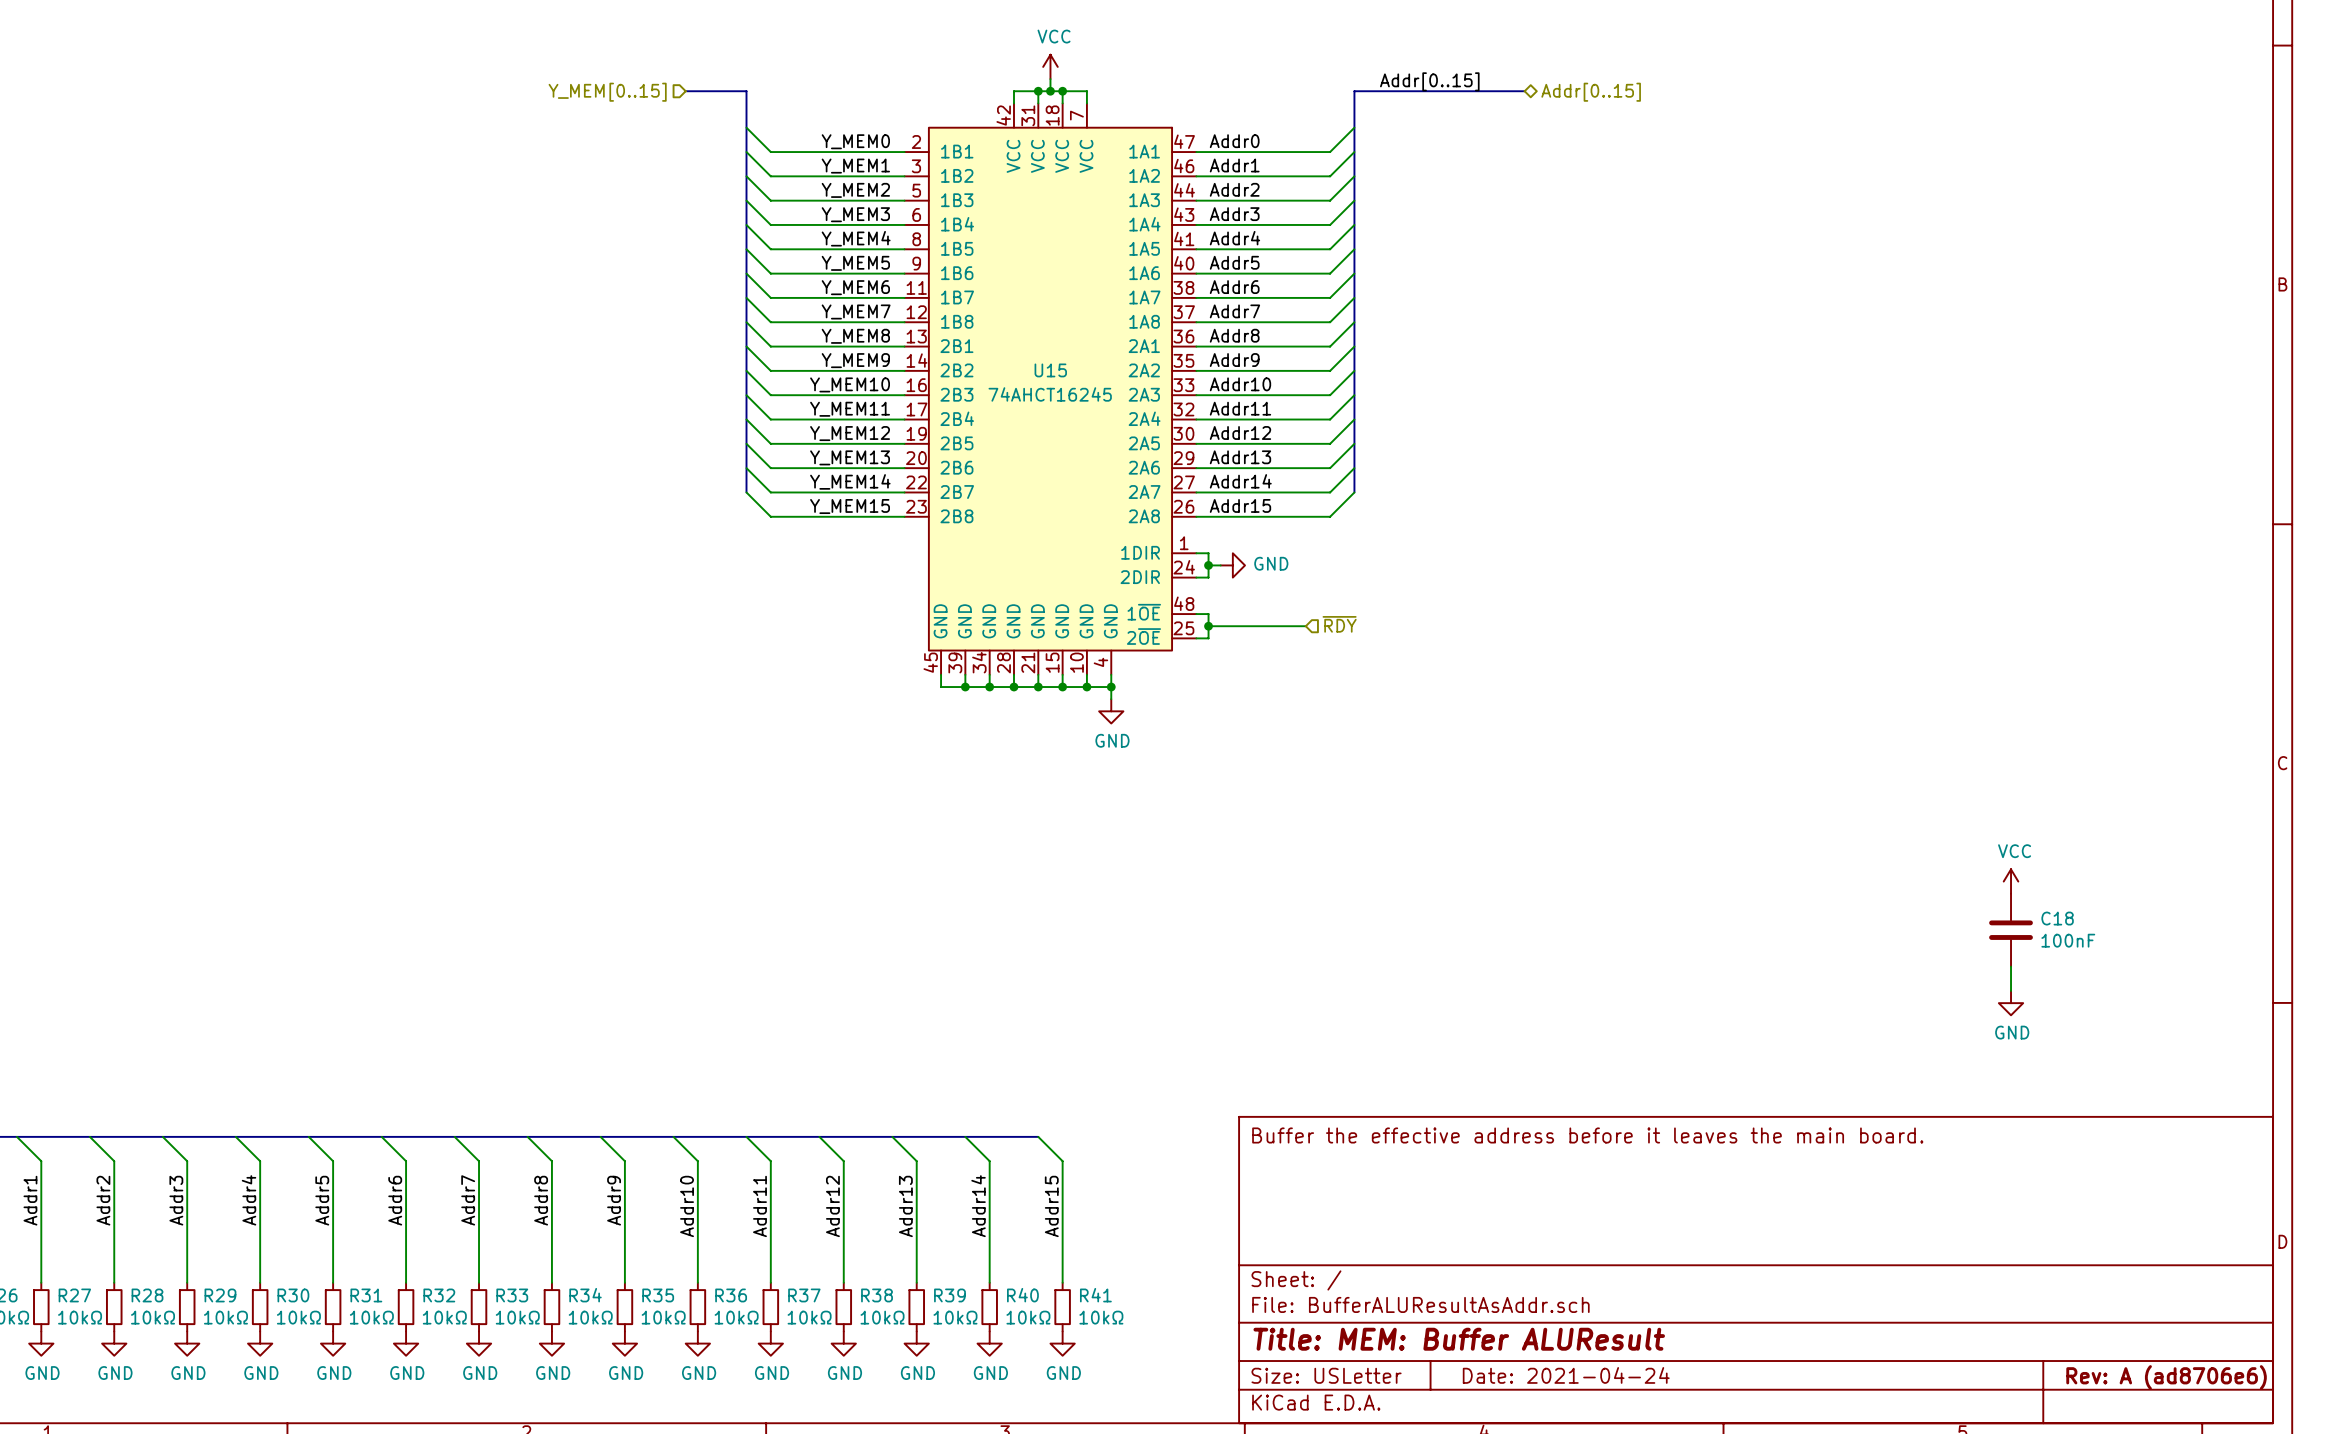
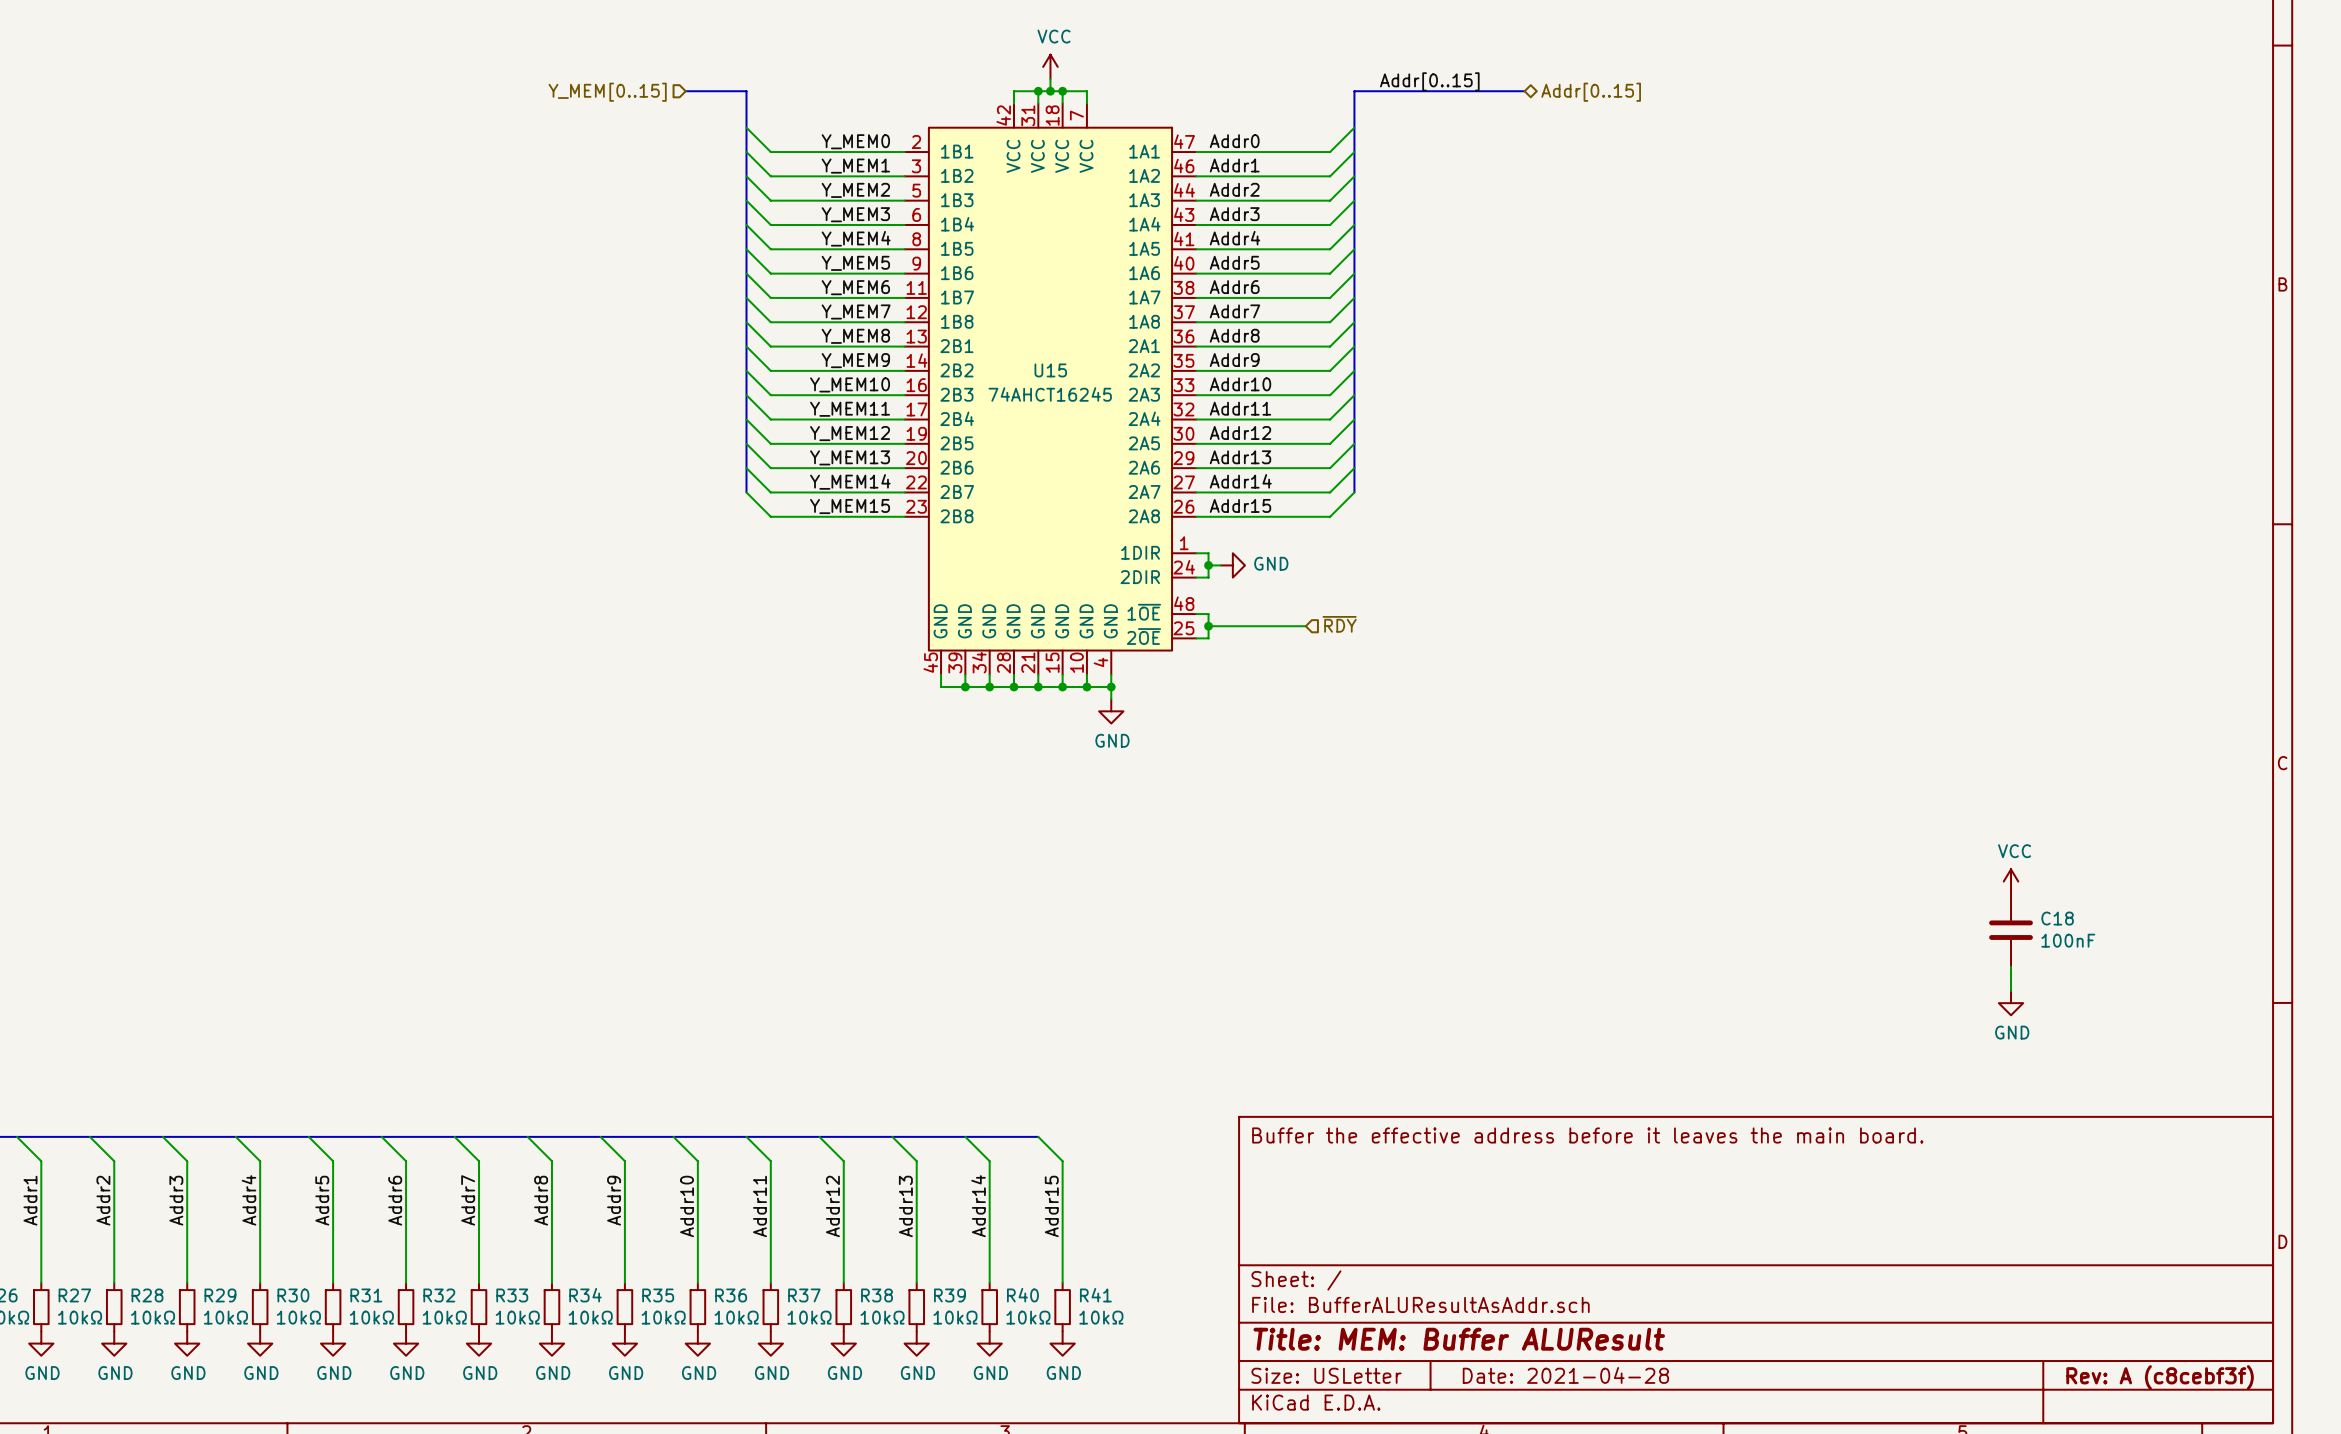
title block: Date: 2021-04-24 (1566, 1375) -> Date: 2021-04-28 (1565, 1375)
title block: Rev: A (ad8706e6) (2166, 1377) -> Rev: A (c8cebf3f) (2160, 1377)

